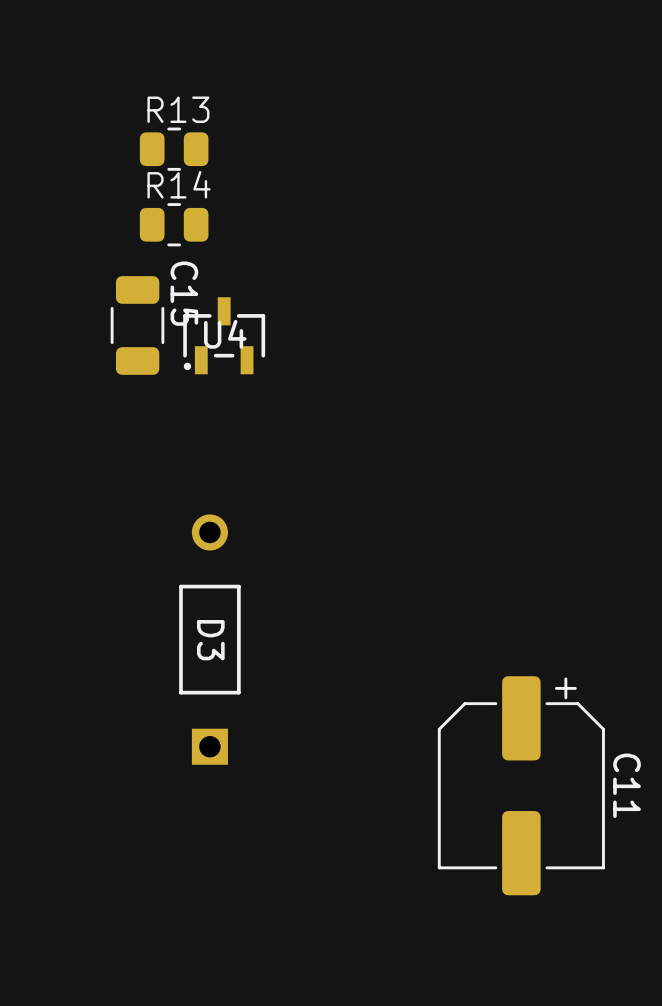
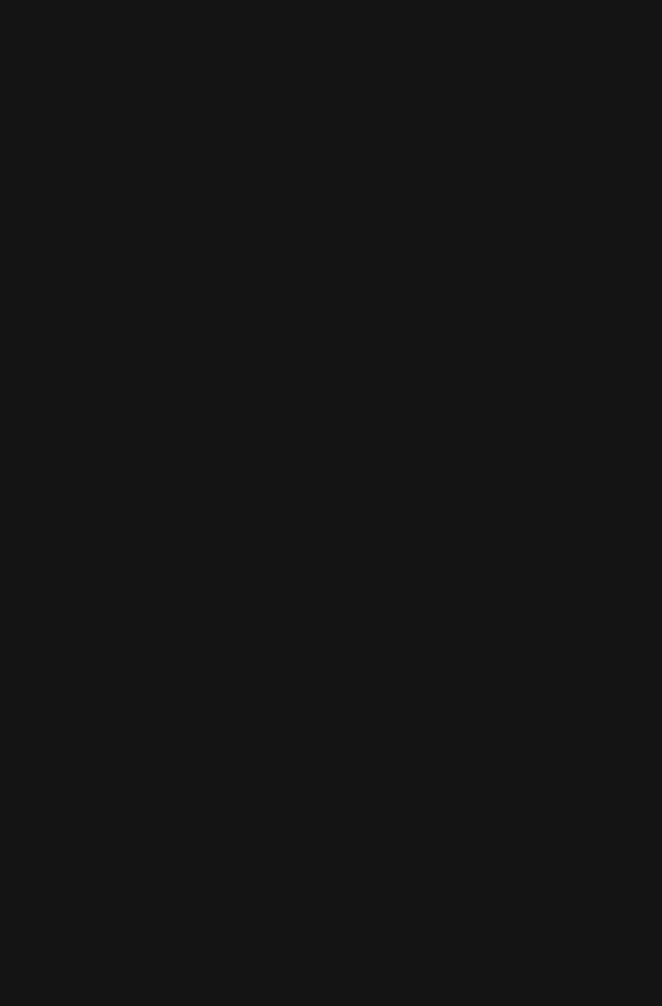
R13: (174, 149) -> none
R14: (174, 224) -> none
C15: (137, 325) -> none
U4: (224, 335) -> none
D3: (209, 639) -> none
C11: (521, 785) -> none

